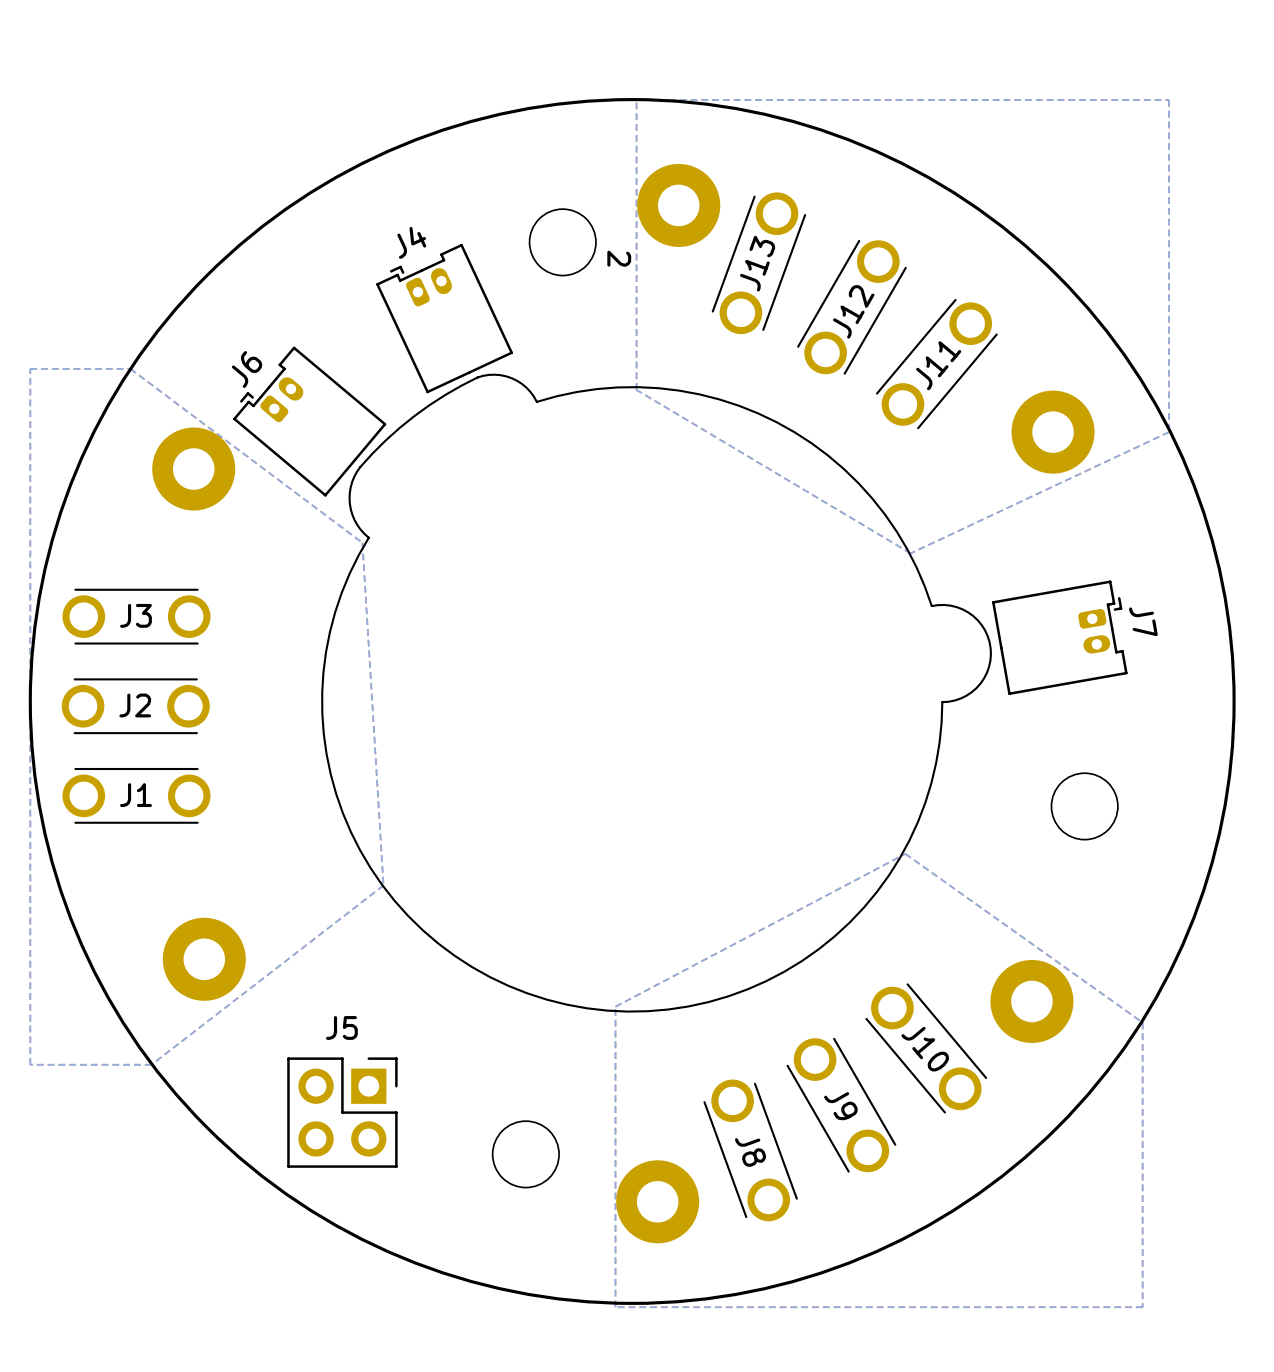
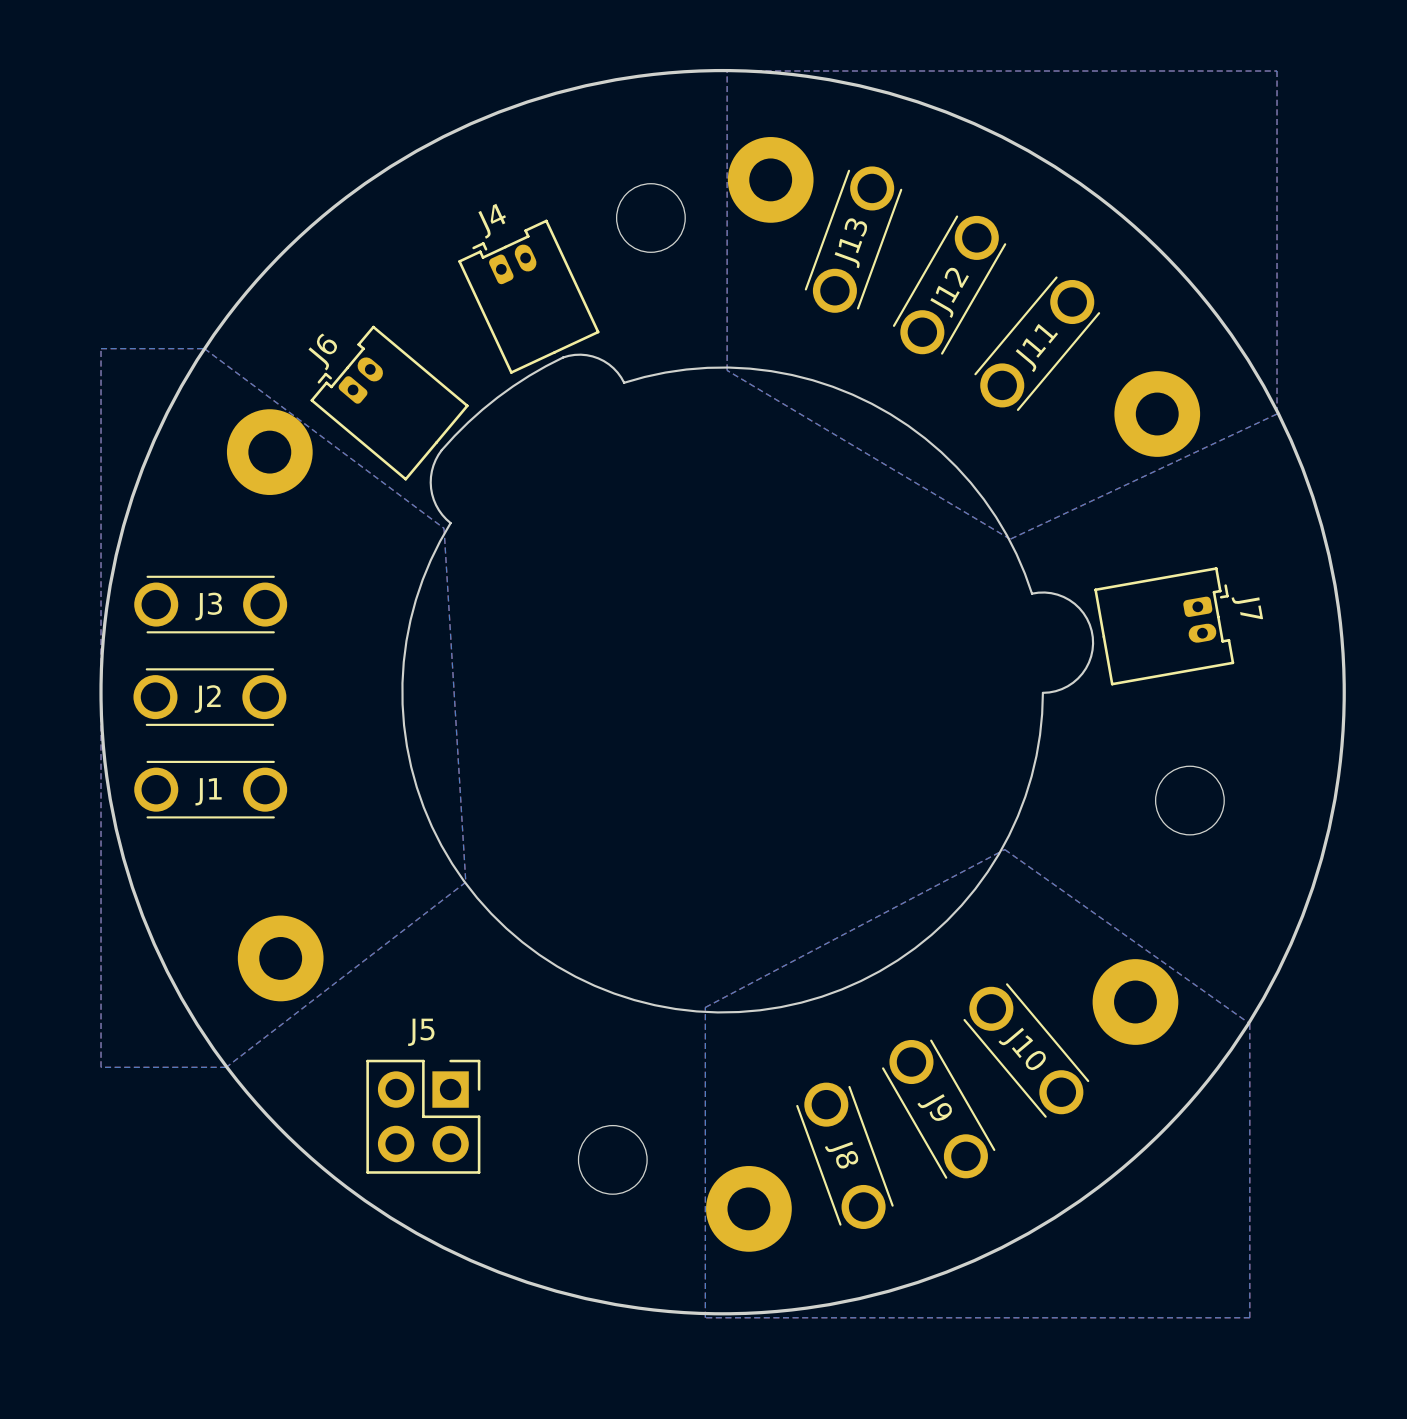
text: 2 (619, 258) -> none

